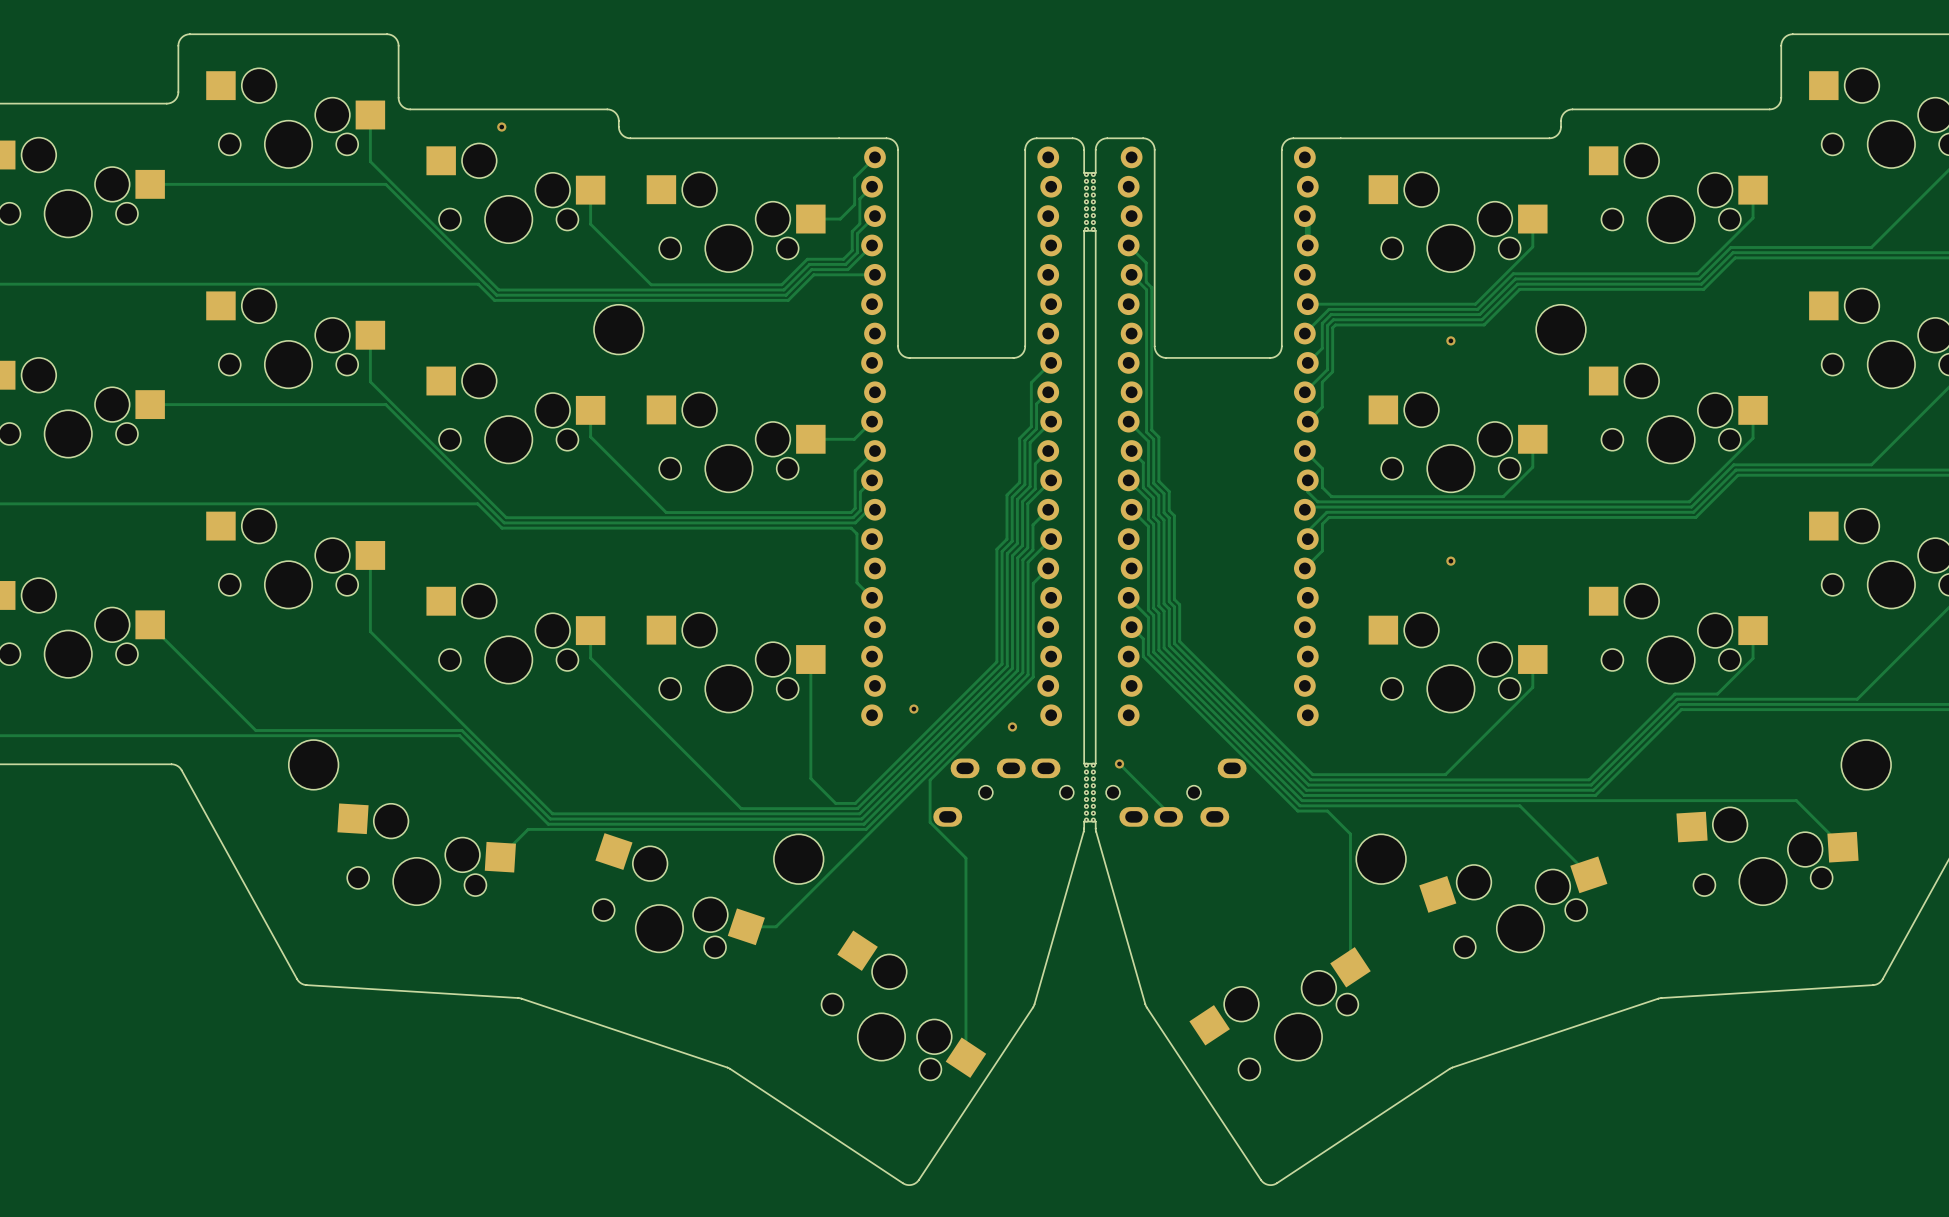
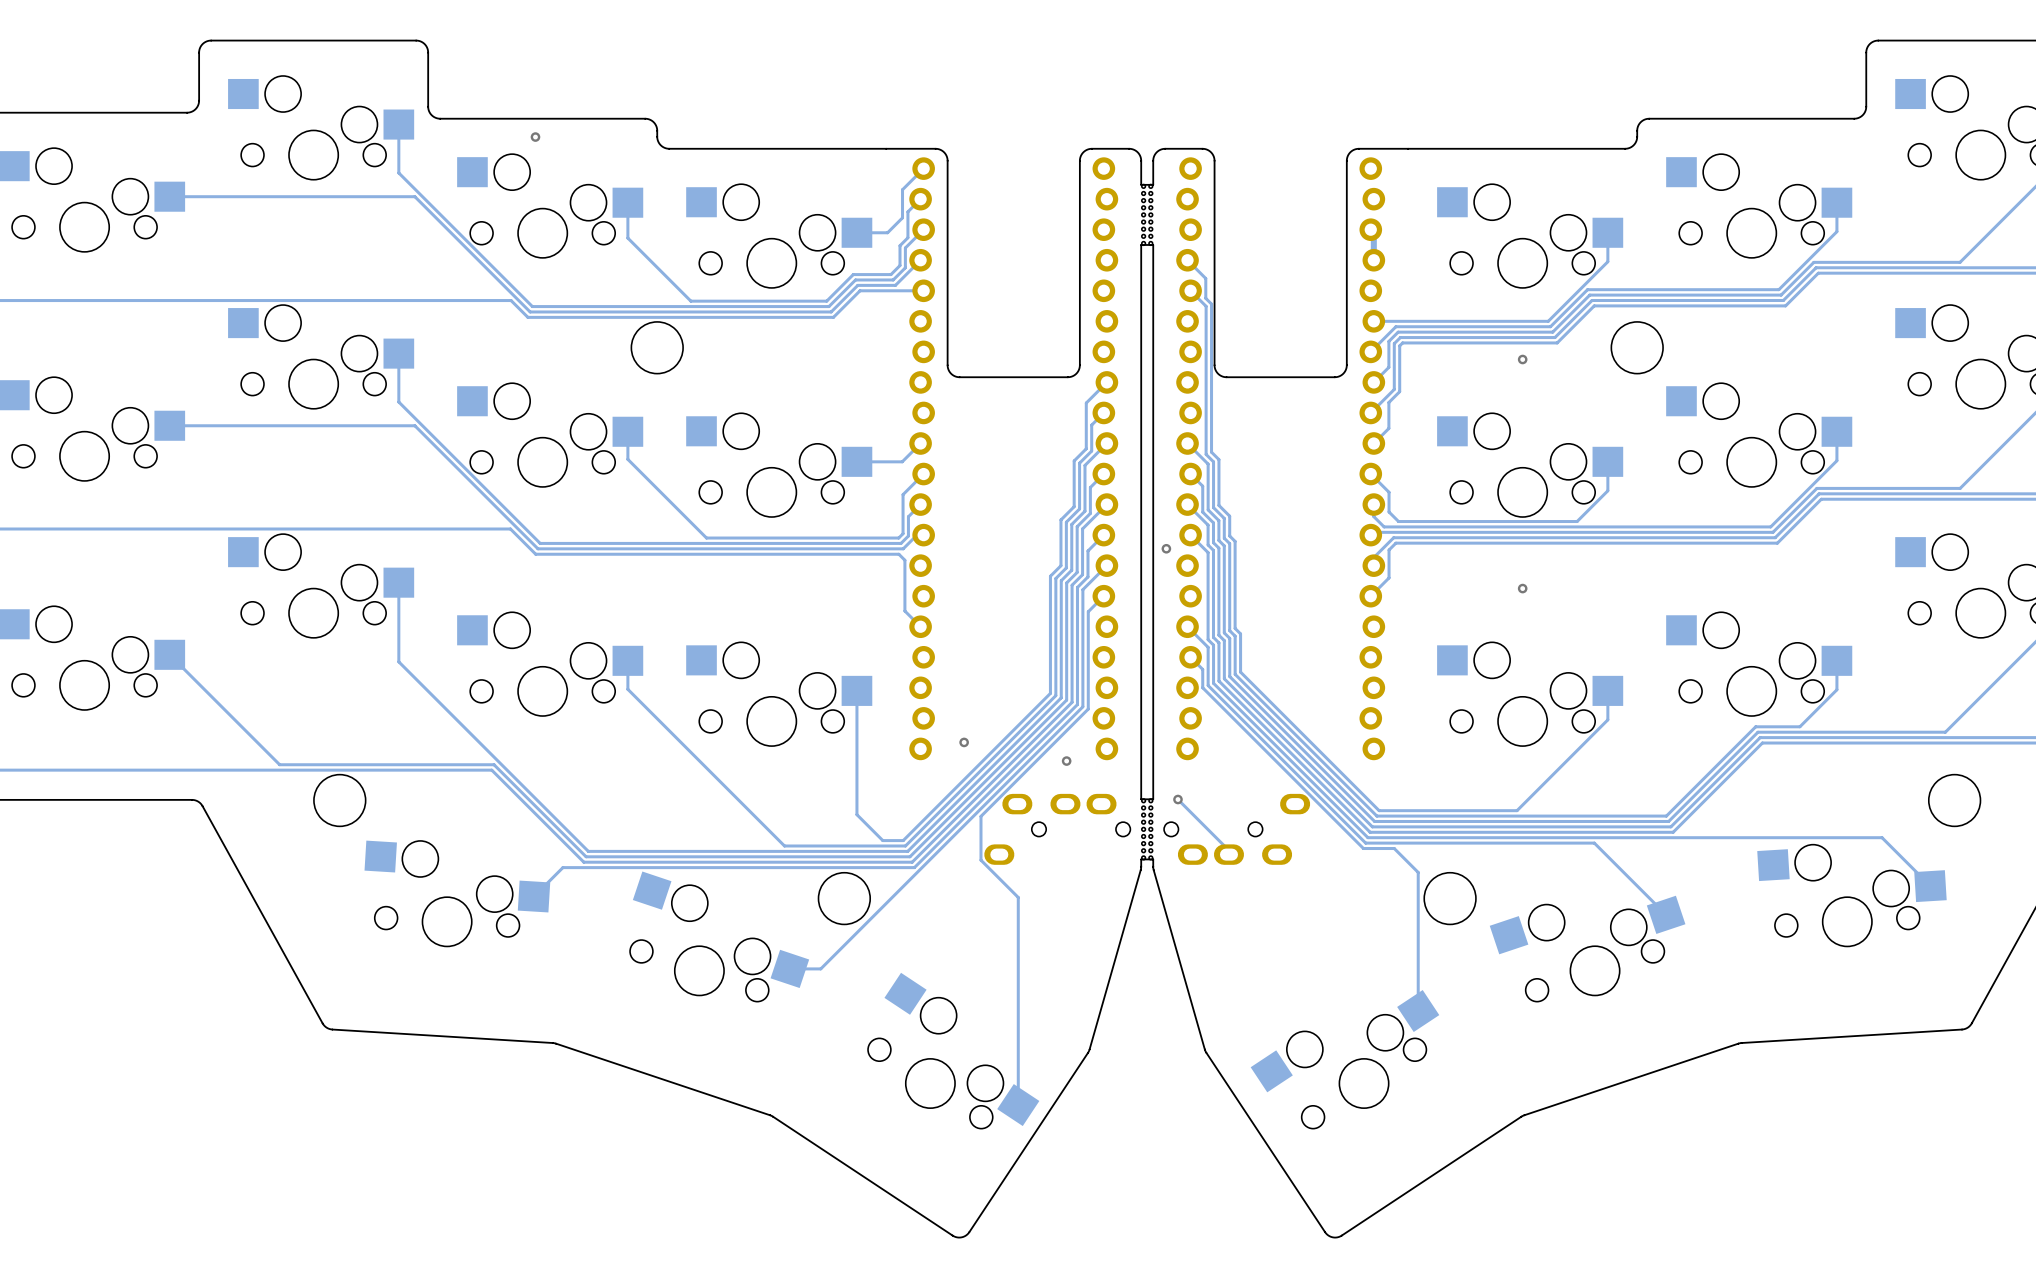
via: none -> (1166, 548)

